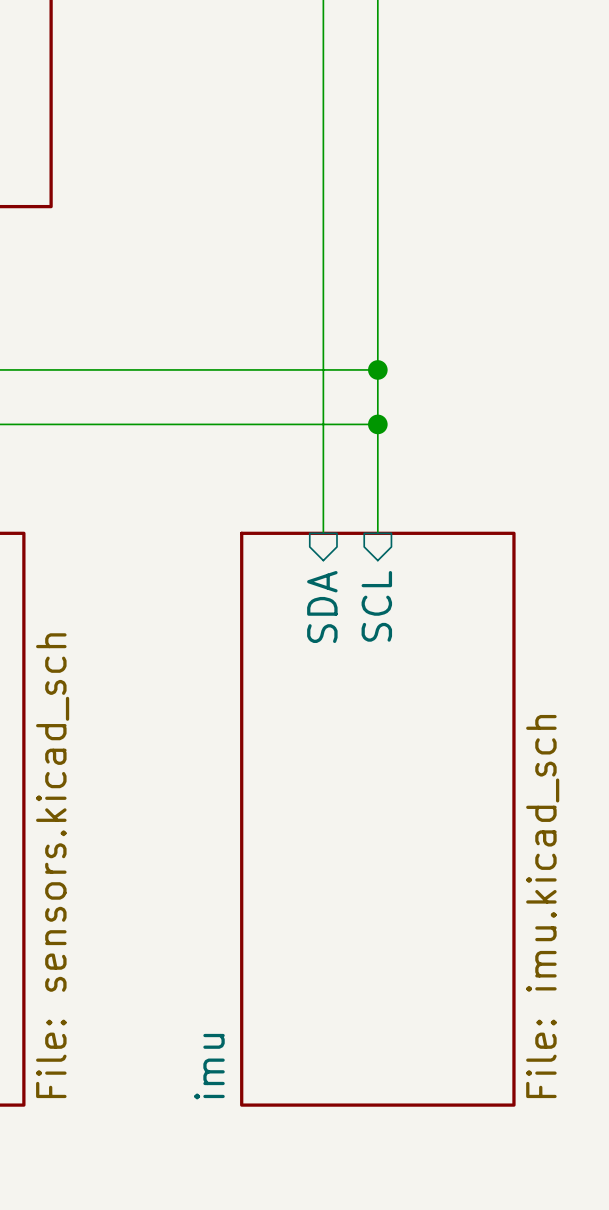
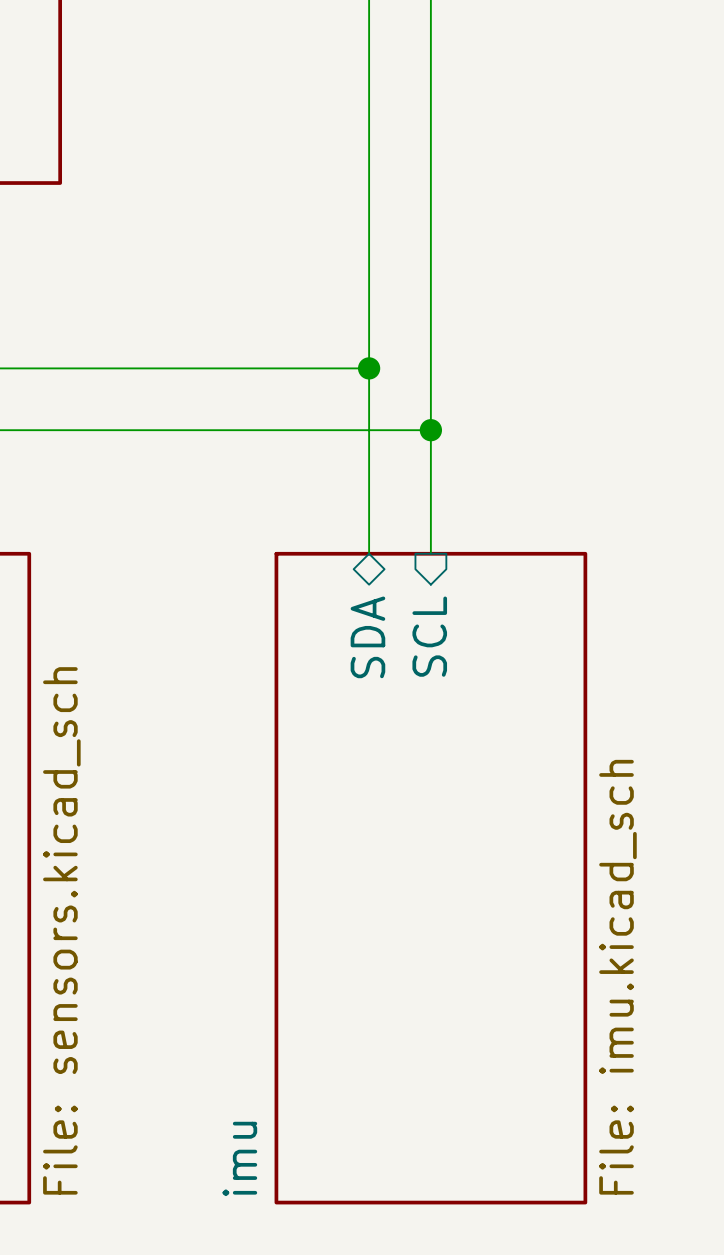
wire: (323, 369) (377, 369) -> none
junction position: (377, 369) -> (369, 368)
sheet pin shape: input (322, 607) -> bidirectional (367, 637)

